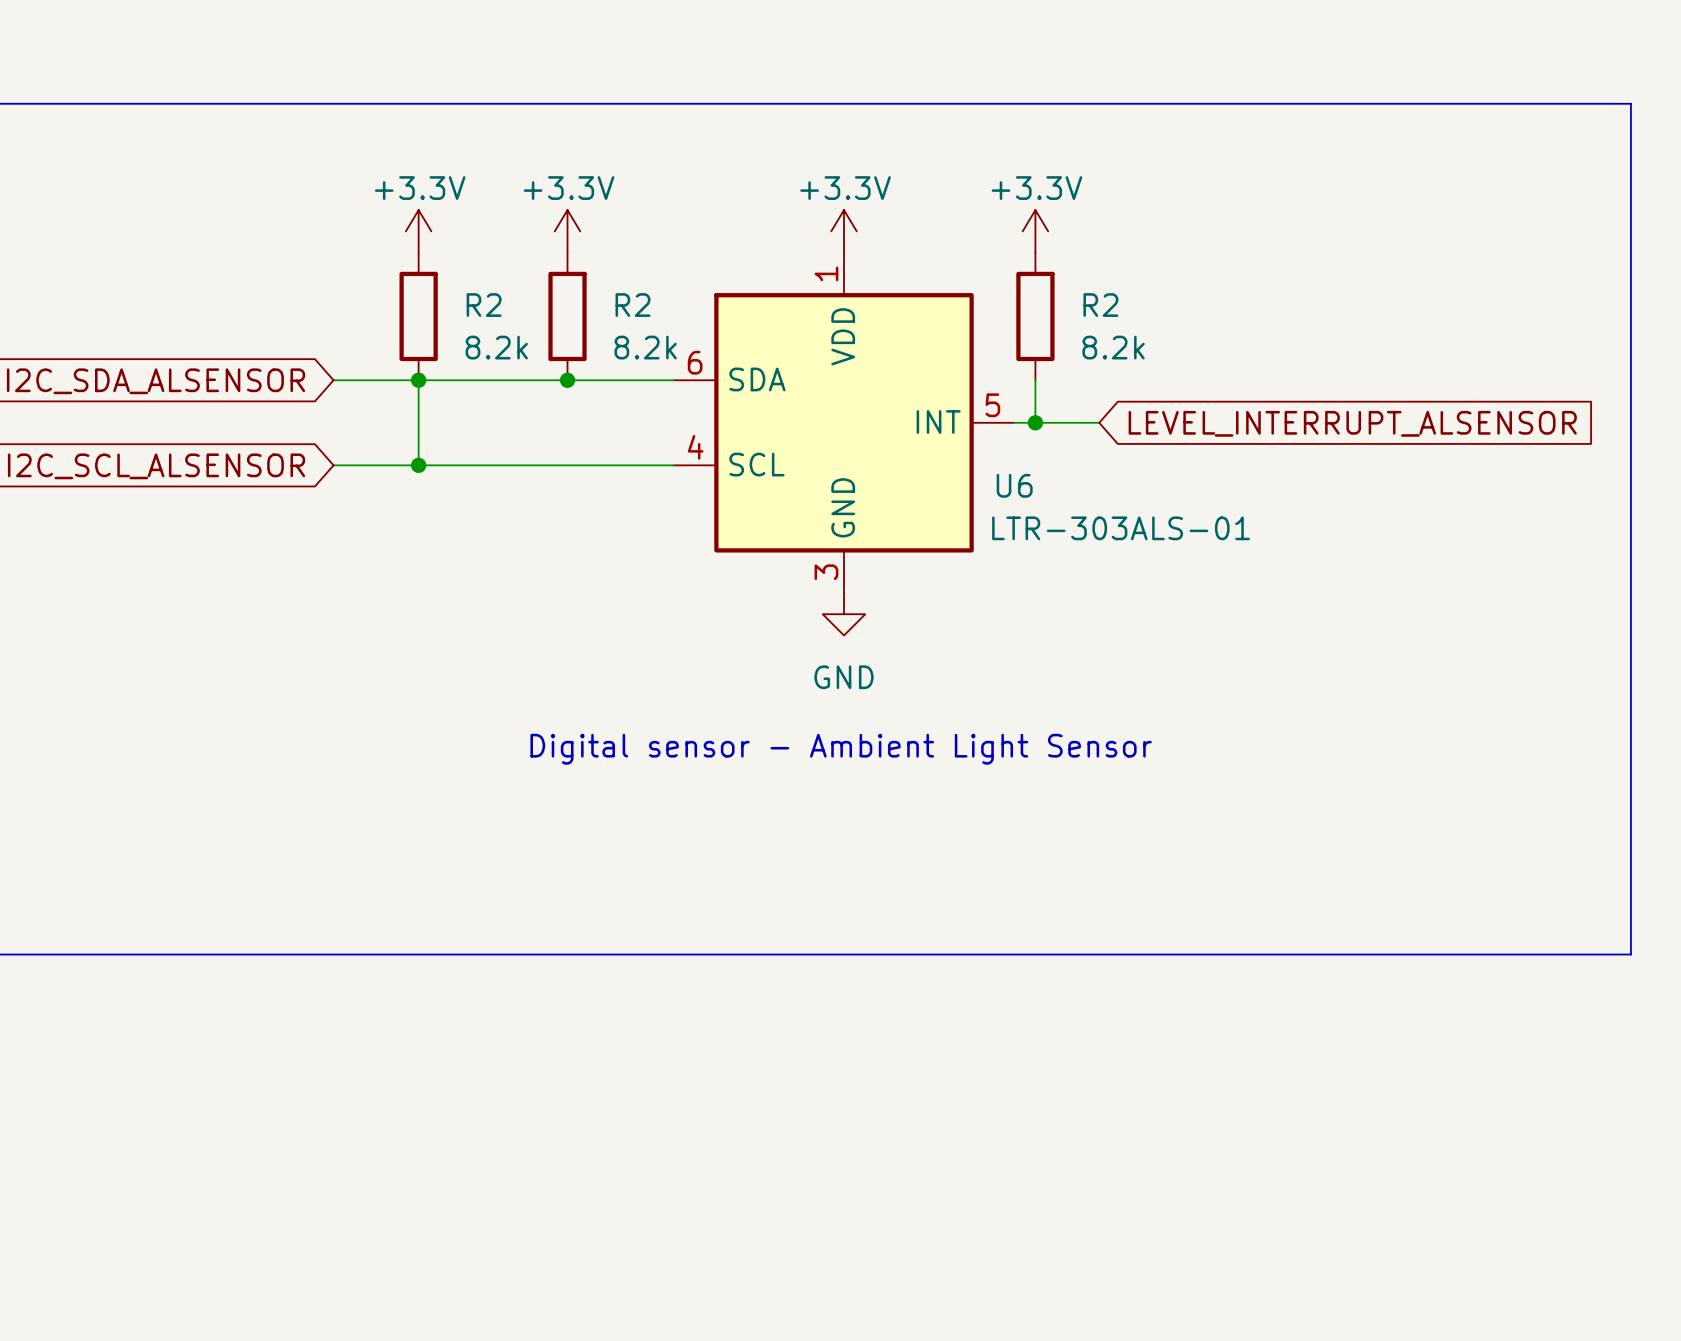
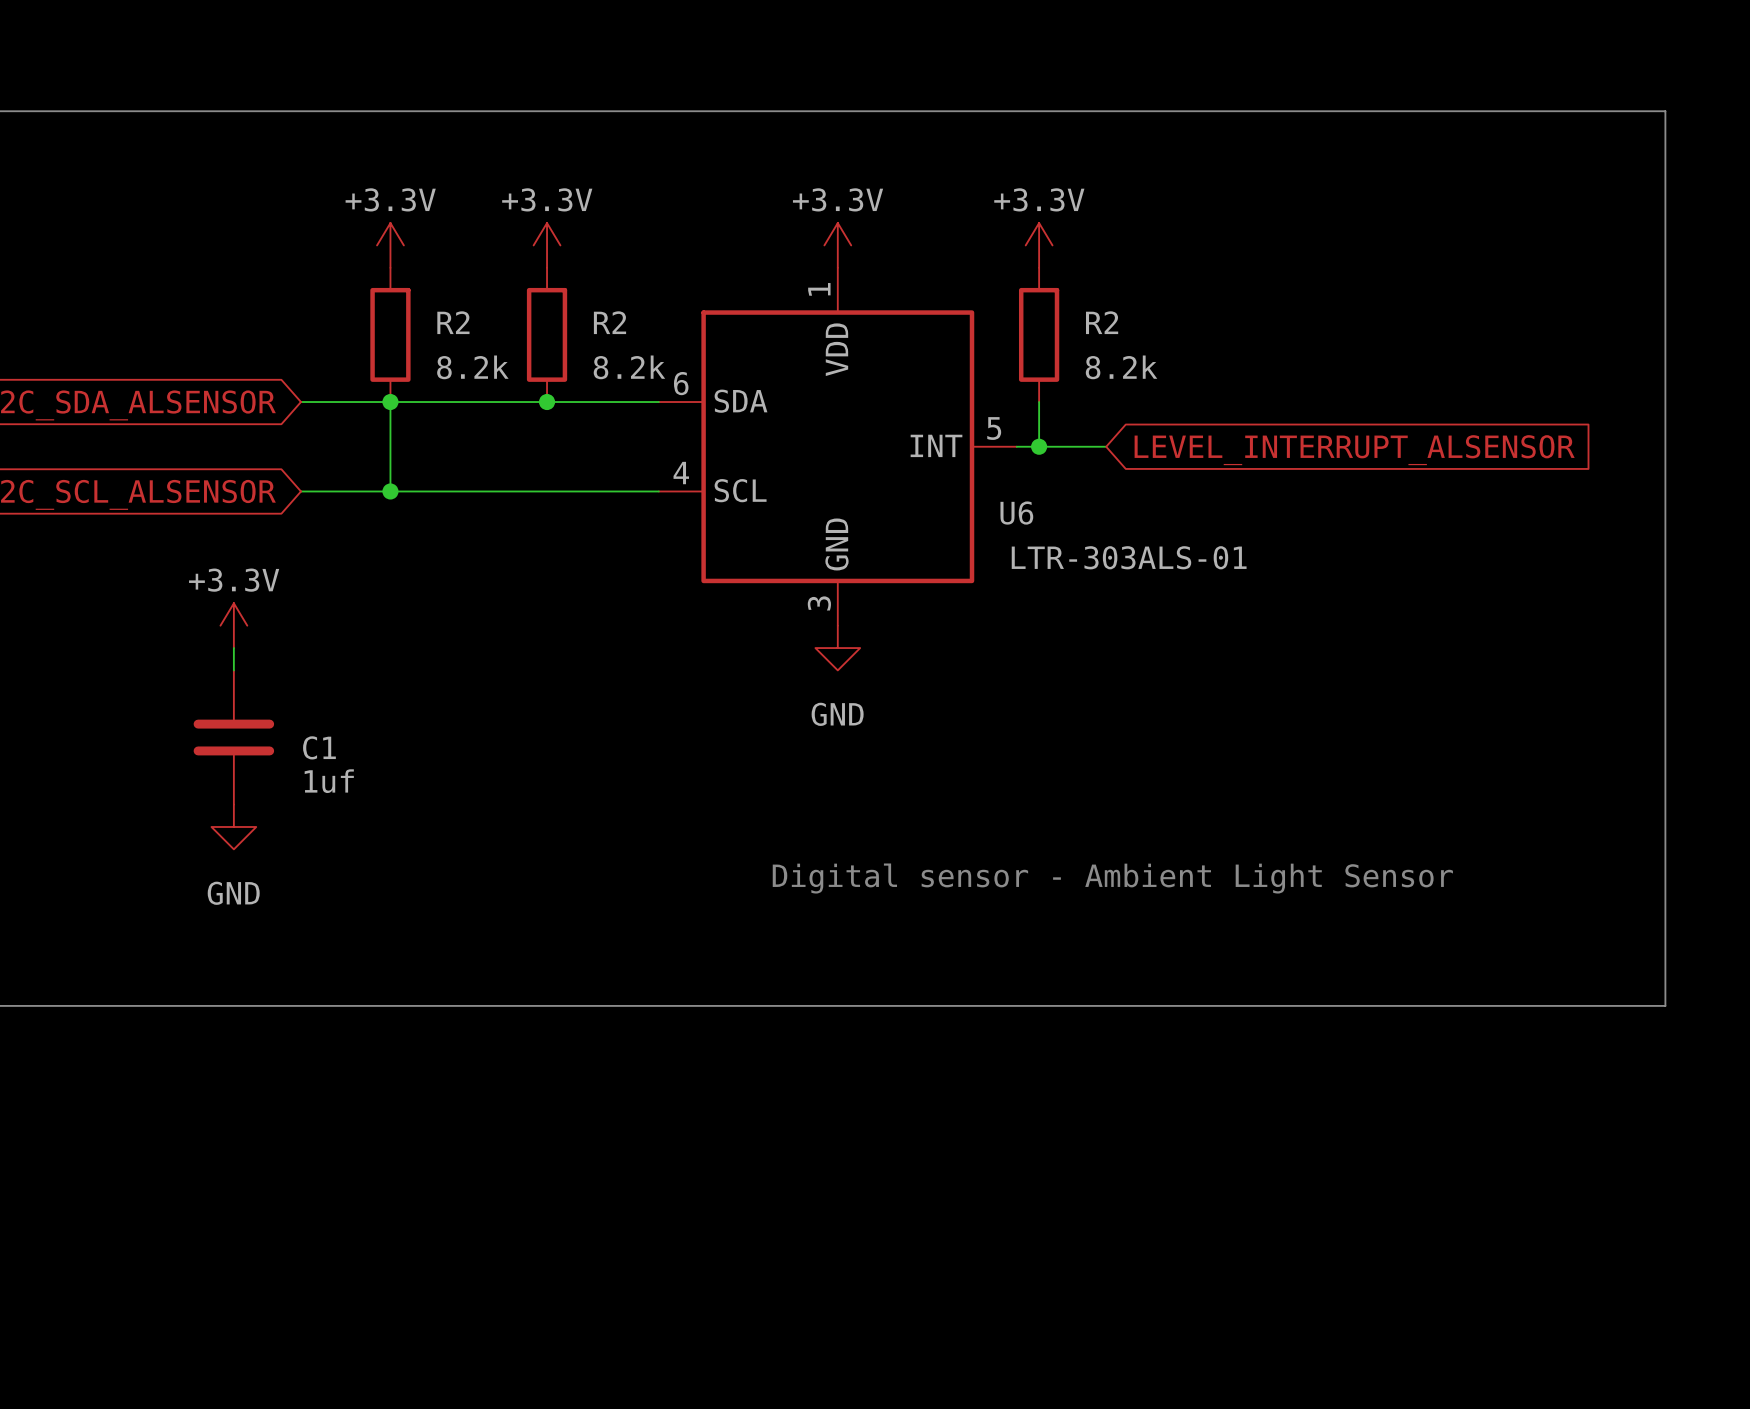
power symbol: none -> +3.3V (233, 625)
wire: none -> (233, 648) (233, 670)
C1: none -> 1uf (233, 737)
text position: Digital sensor - Ambient Light Sensor (841, 749) -> Digital sensor - Ambient Light Sensor (1112, 878)
power symbol: none -> GND (233, 826)

